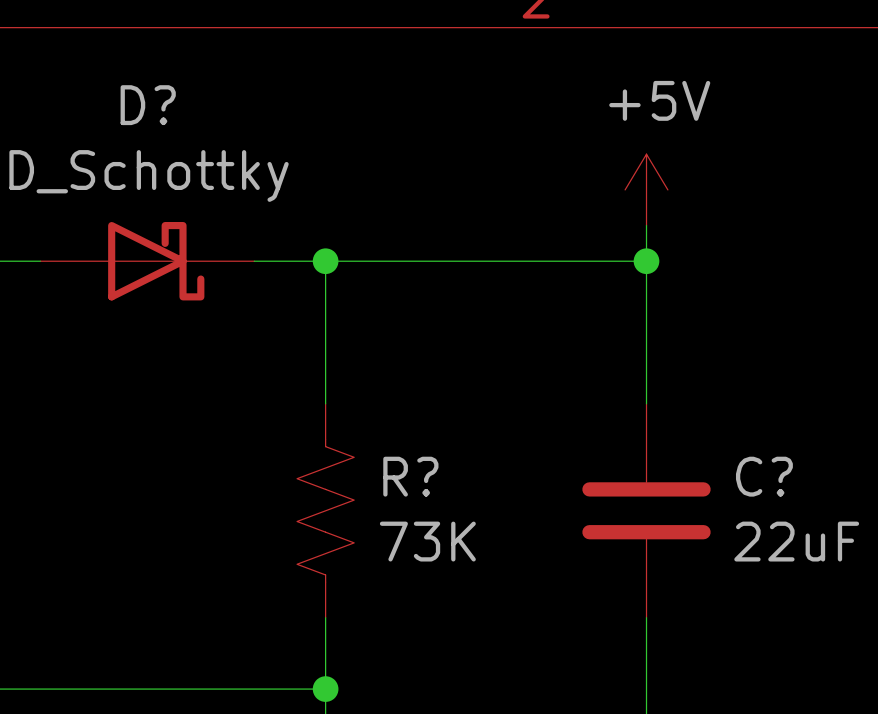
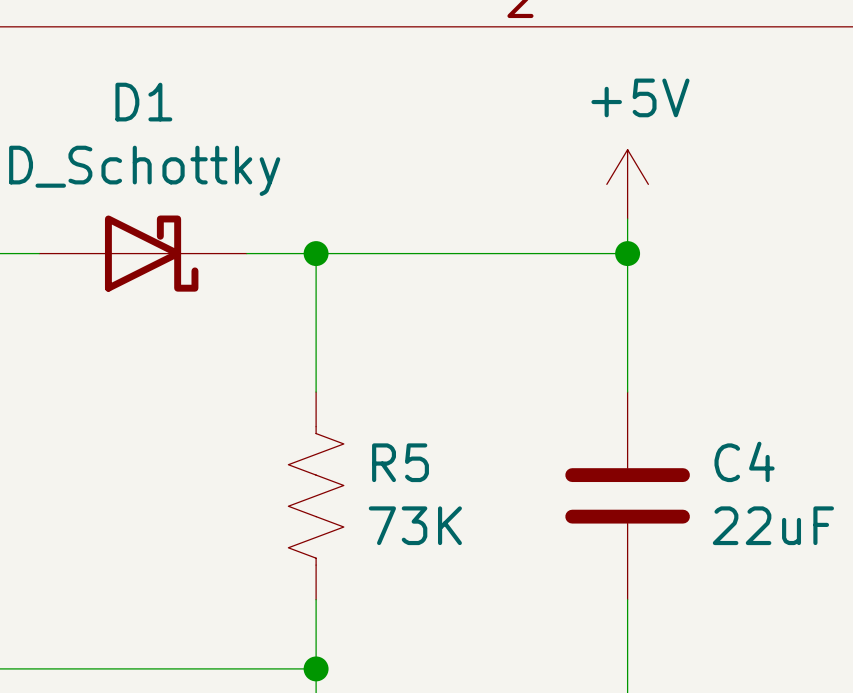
D? name: D? (148, 105) -> D1 (143, 102)
R? name: R? (410, 476) -> R5 (400, 462)
C? name: C? (764, 476) -> C4 (744, 461)

